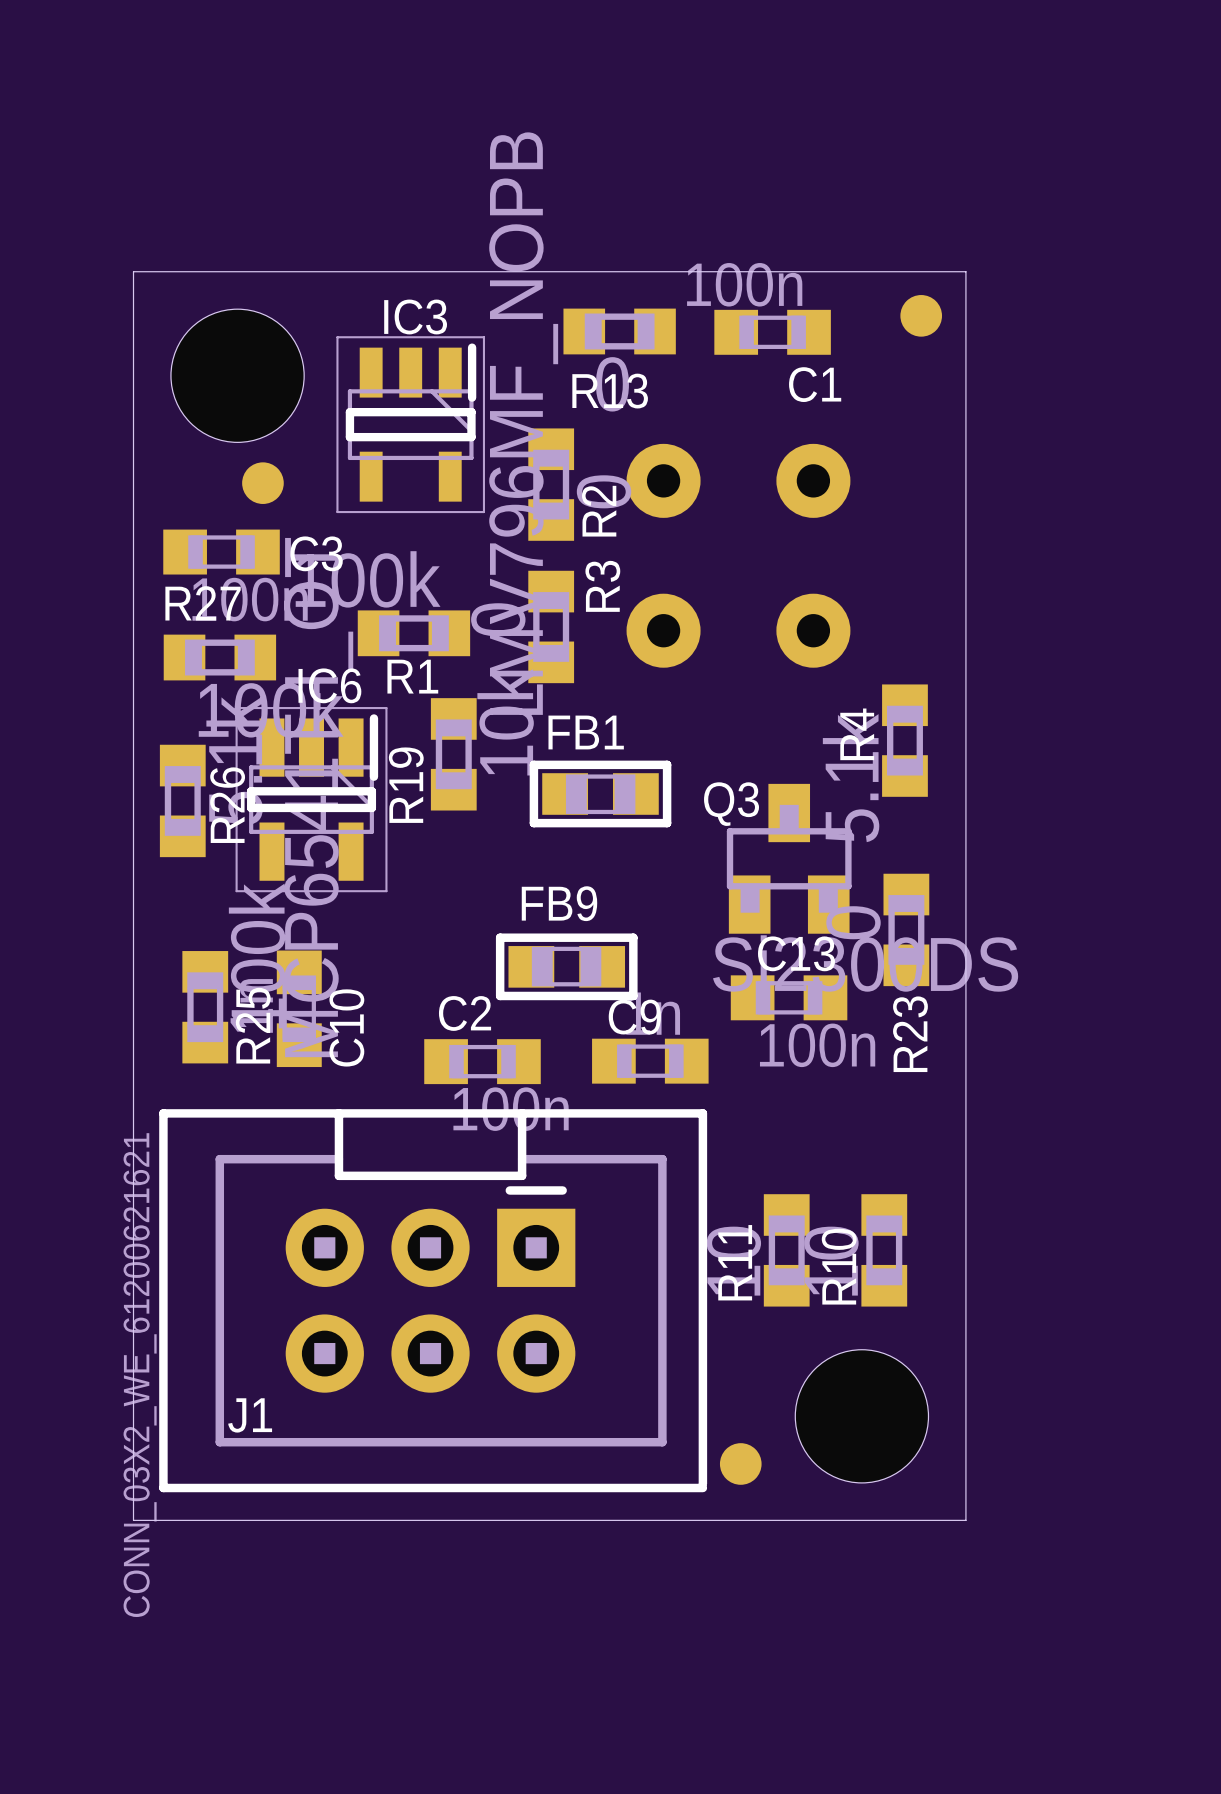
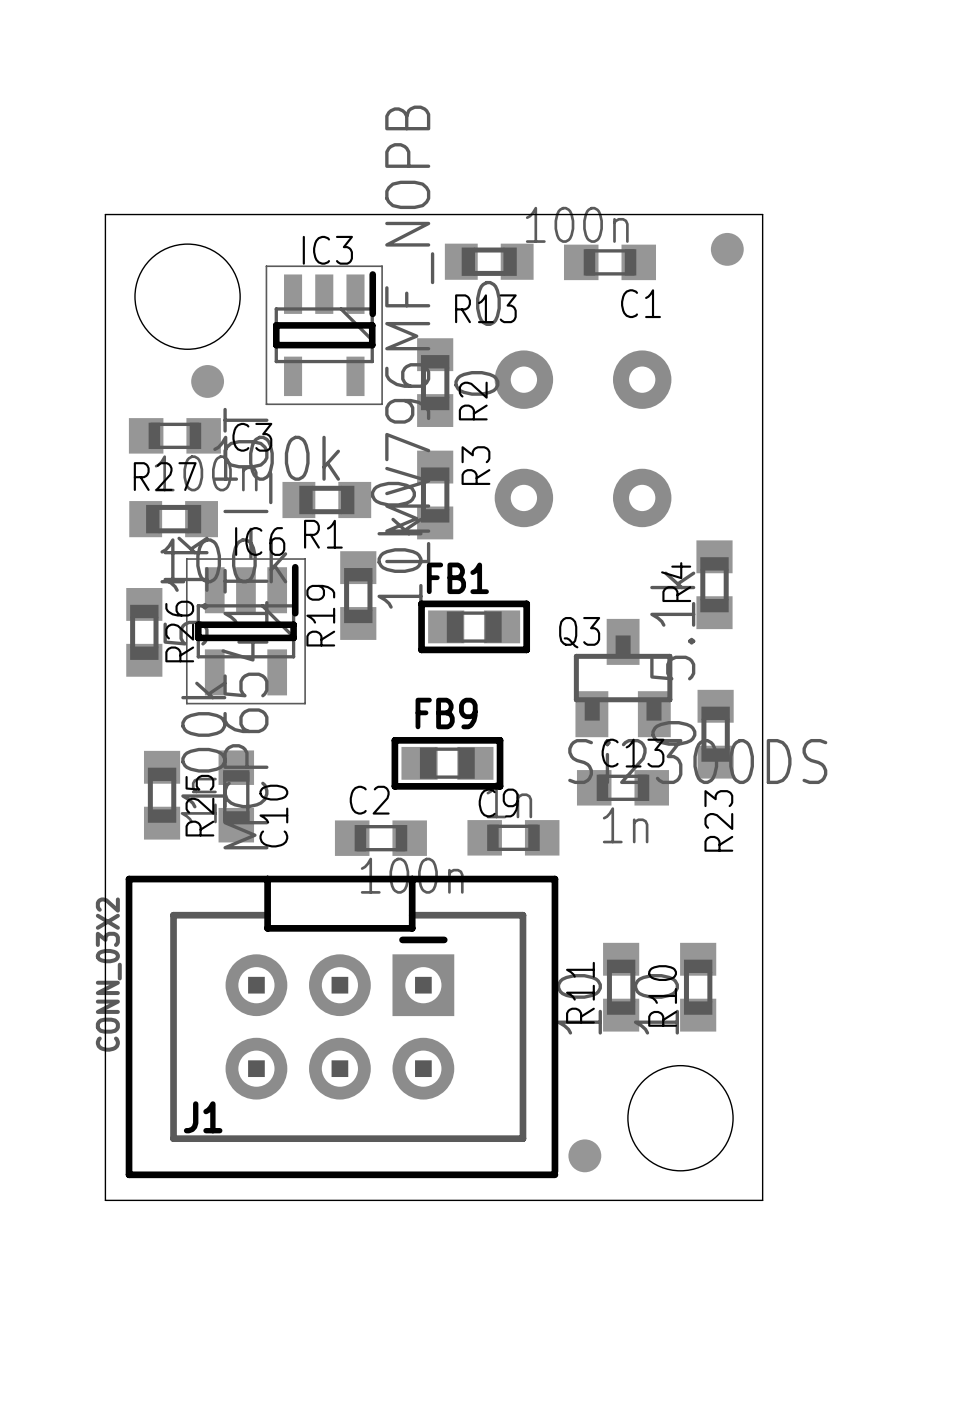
C13 value: 100n (817, 1045) -> 1n (625, 825)
J1 value: CONN_03X2_WE_61200621621 (140, 1375) -> CONN_03X2 (108, 974)

